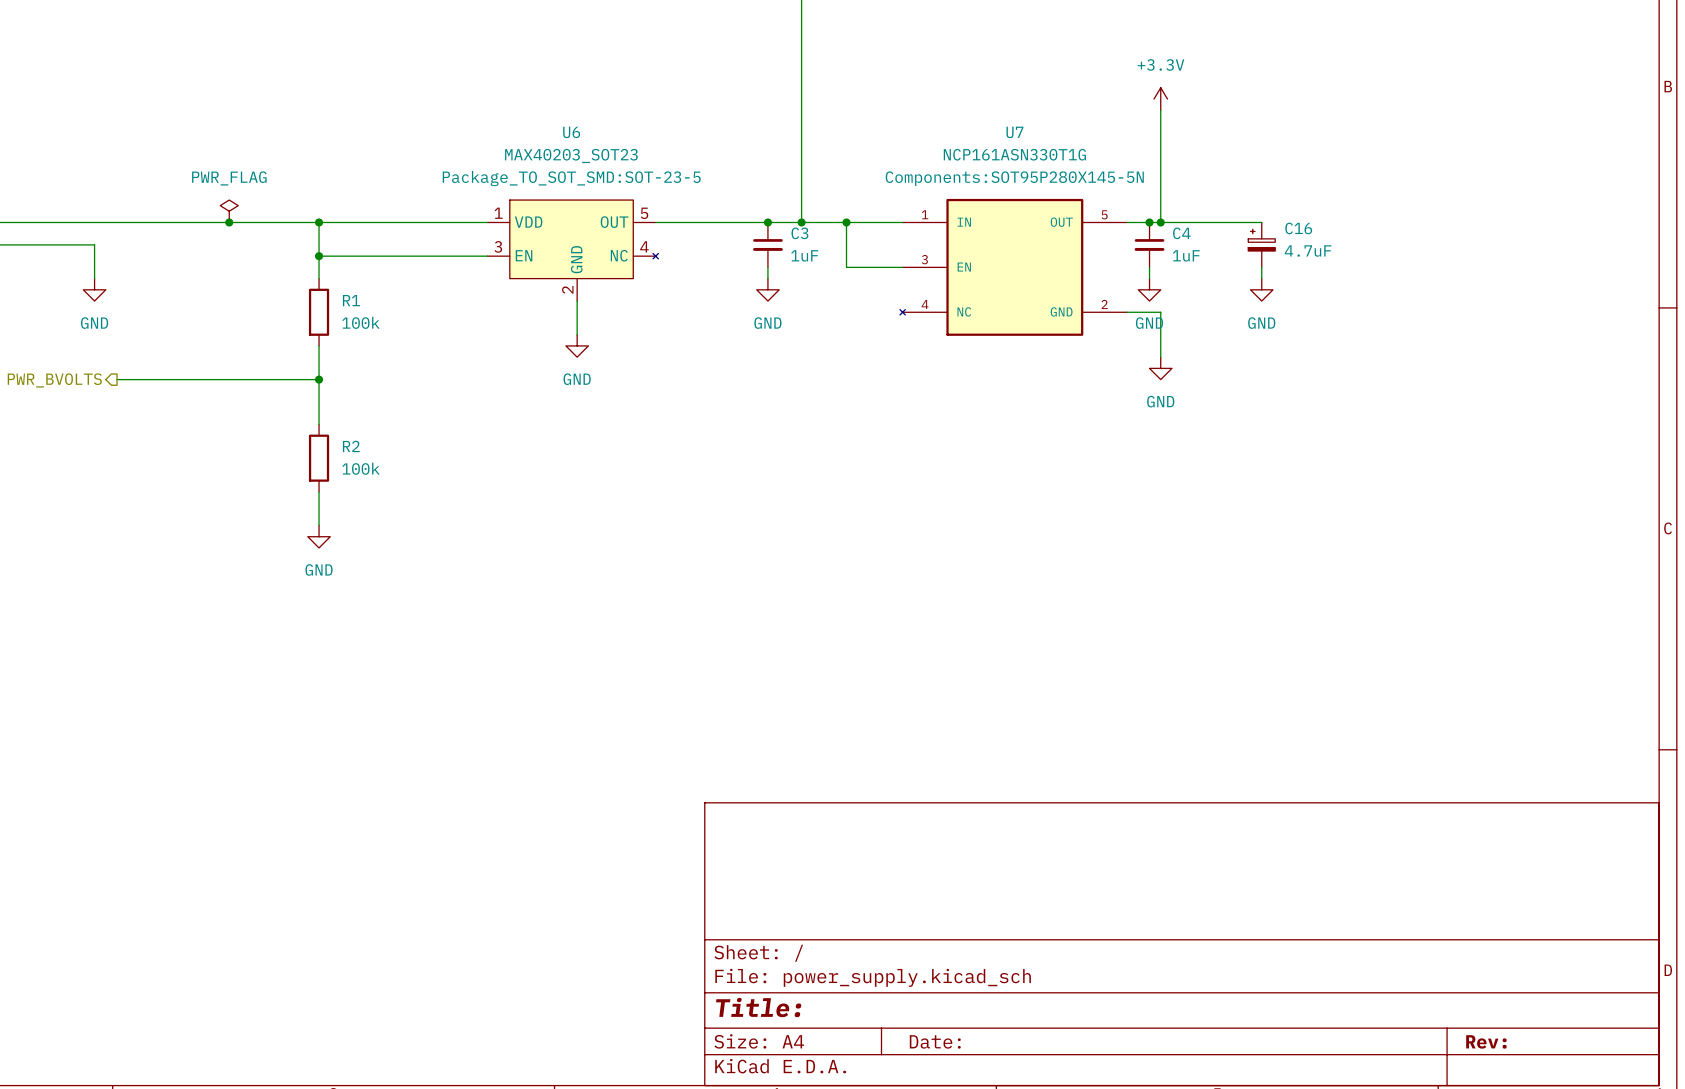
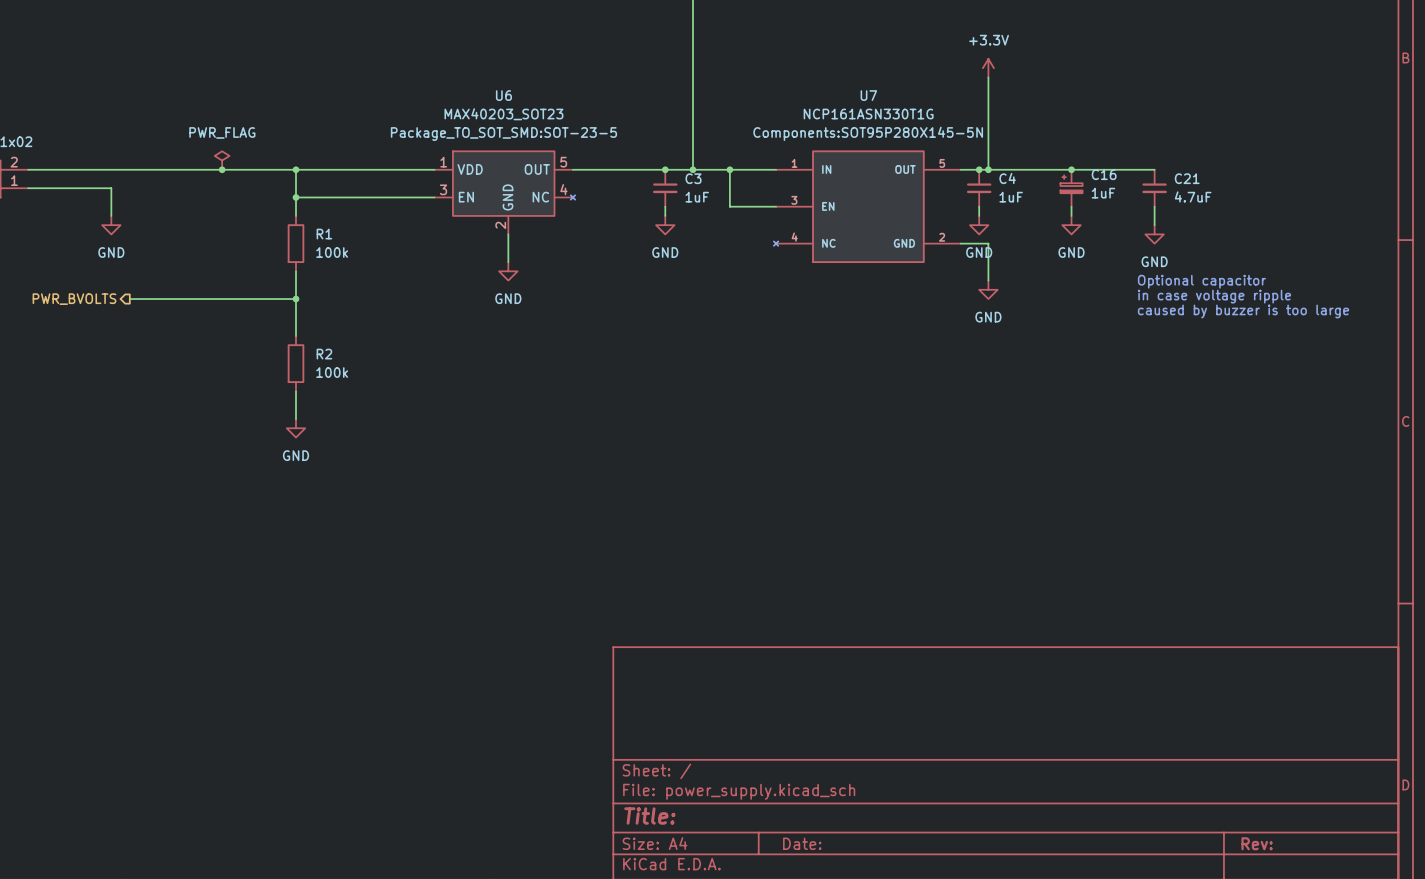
wire: none -> (1071, 169) (1154, 169)
junction: none -> (1071, 169)
C21: none -> 4.7uF (1154, 188)
C16 value: 4.7uF (1308, 251) -> 1uF (1103, 193)
wire: none -> (1154, 206) (1154, 225)
power symbol: none -> GND (1154, 234)
text: none -> Optional capacitor (1201, 281)
text: none -> in case voltage ripple (1214, 296)
text: none -> caused by buzzer is too large (1243, 311)

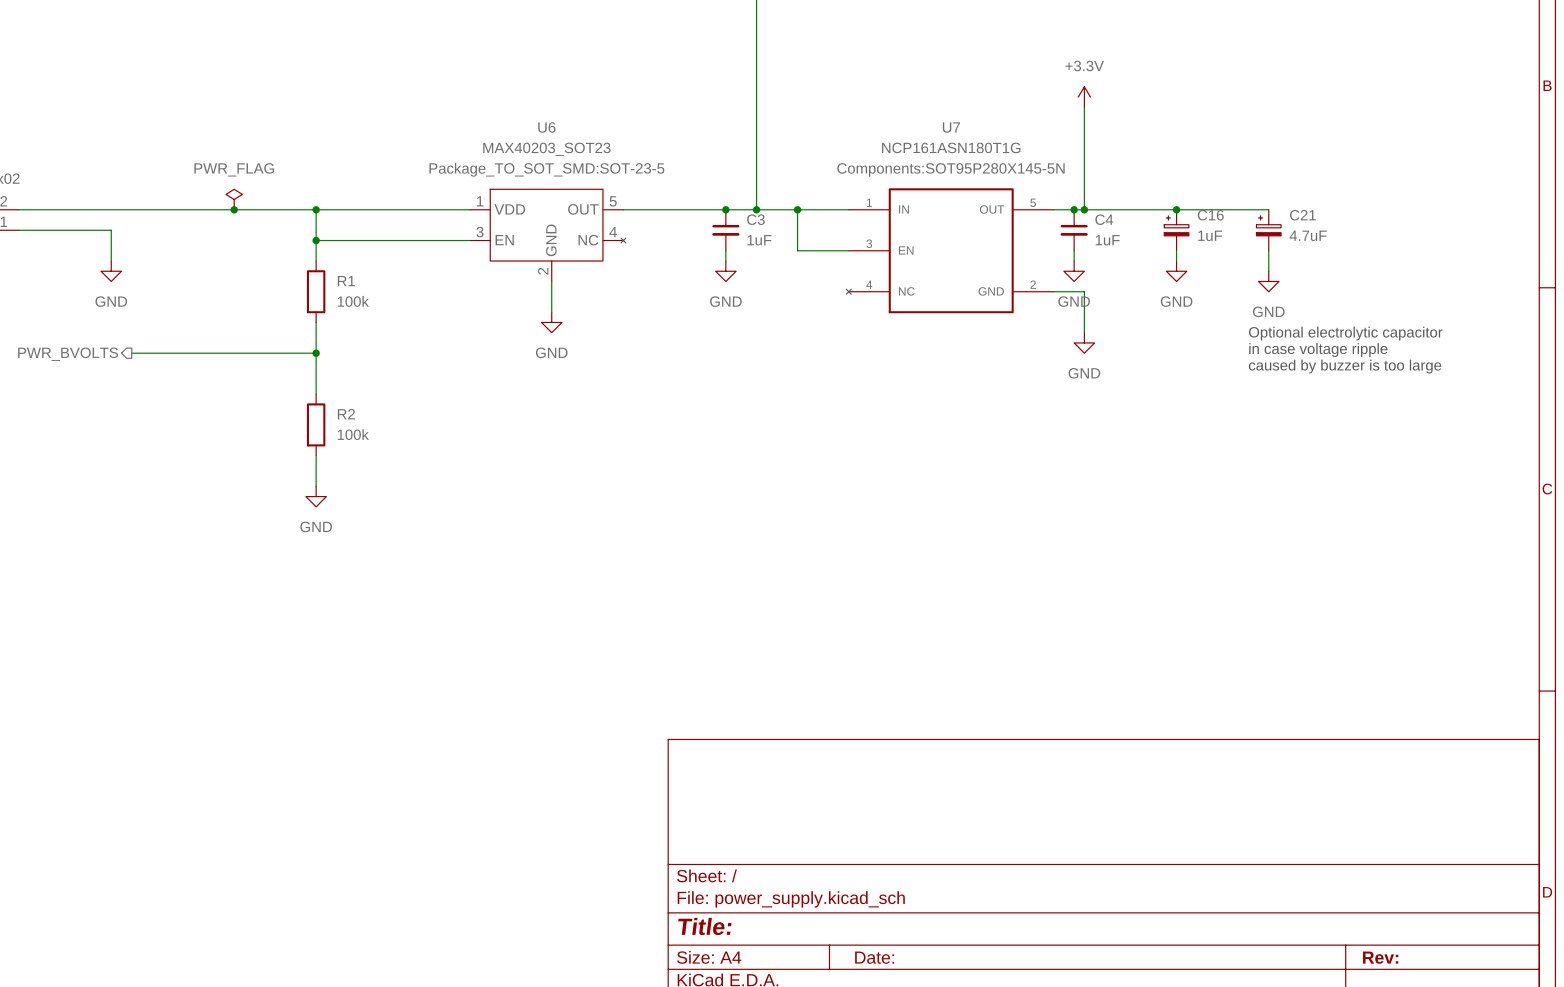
U7 value: NCP161ASN330T1G (868, 114) -> NCP161ASN180T1G (951, 147)
C21 symbol: [1142, 169, 1167, 207] -> [1256, 209, 1282, 251]
text: Optional capacitor (1201, 281) -> Optional electrolytic capacitor (1345, 333)

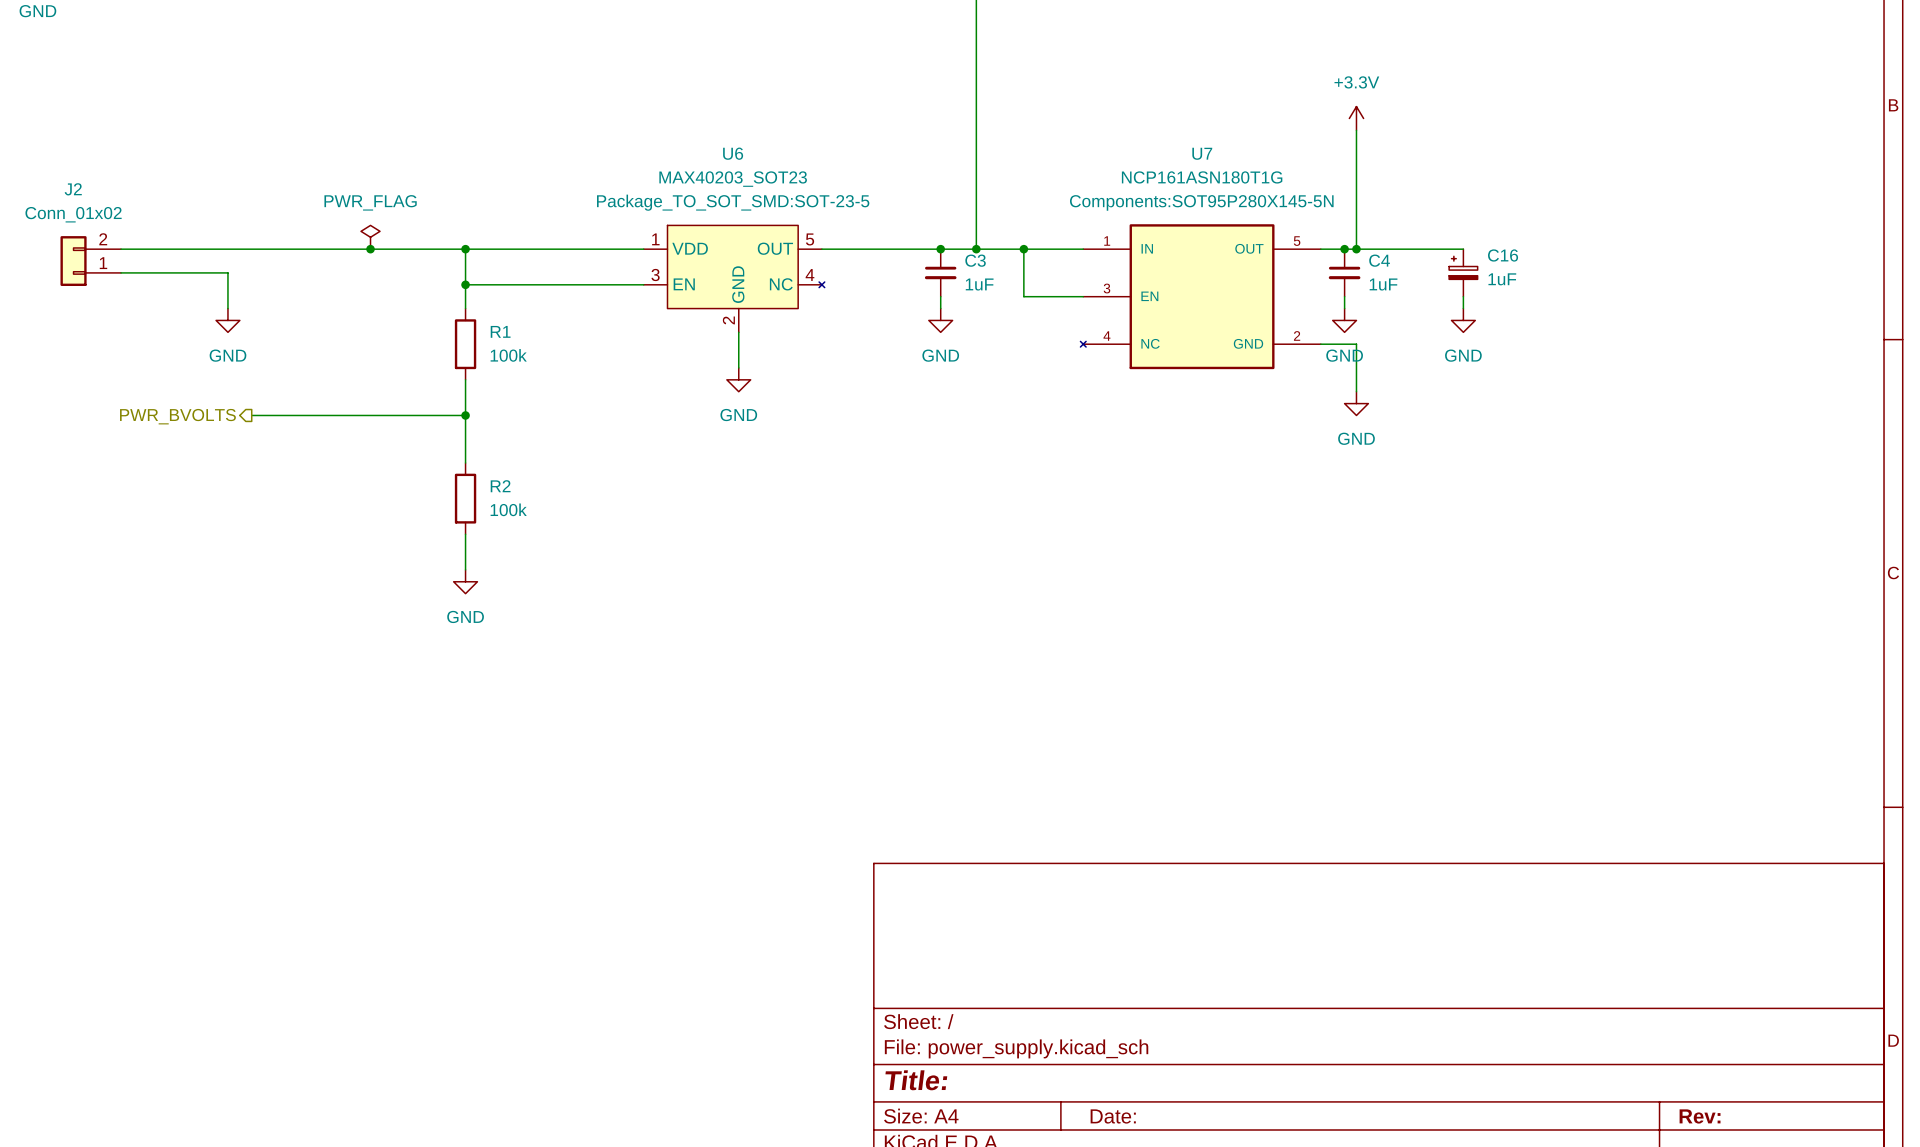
wire: (1176, 209) (1268, 209) -> none
junction: (1176, 209) -> none
C21: 4.7uF (1268, 230) -> none
wire: (1268, 250) (1268, 271) -> none
power symbol: GND (1268, 281) -> none
text: Optional electrolytic capacitor (1345, 333) -> none
text: in case voltage ripple (1318, 350) -> none
text: caused by buzzer is too large (1345, 366) -> none

